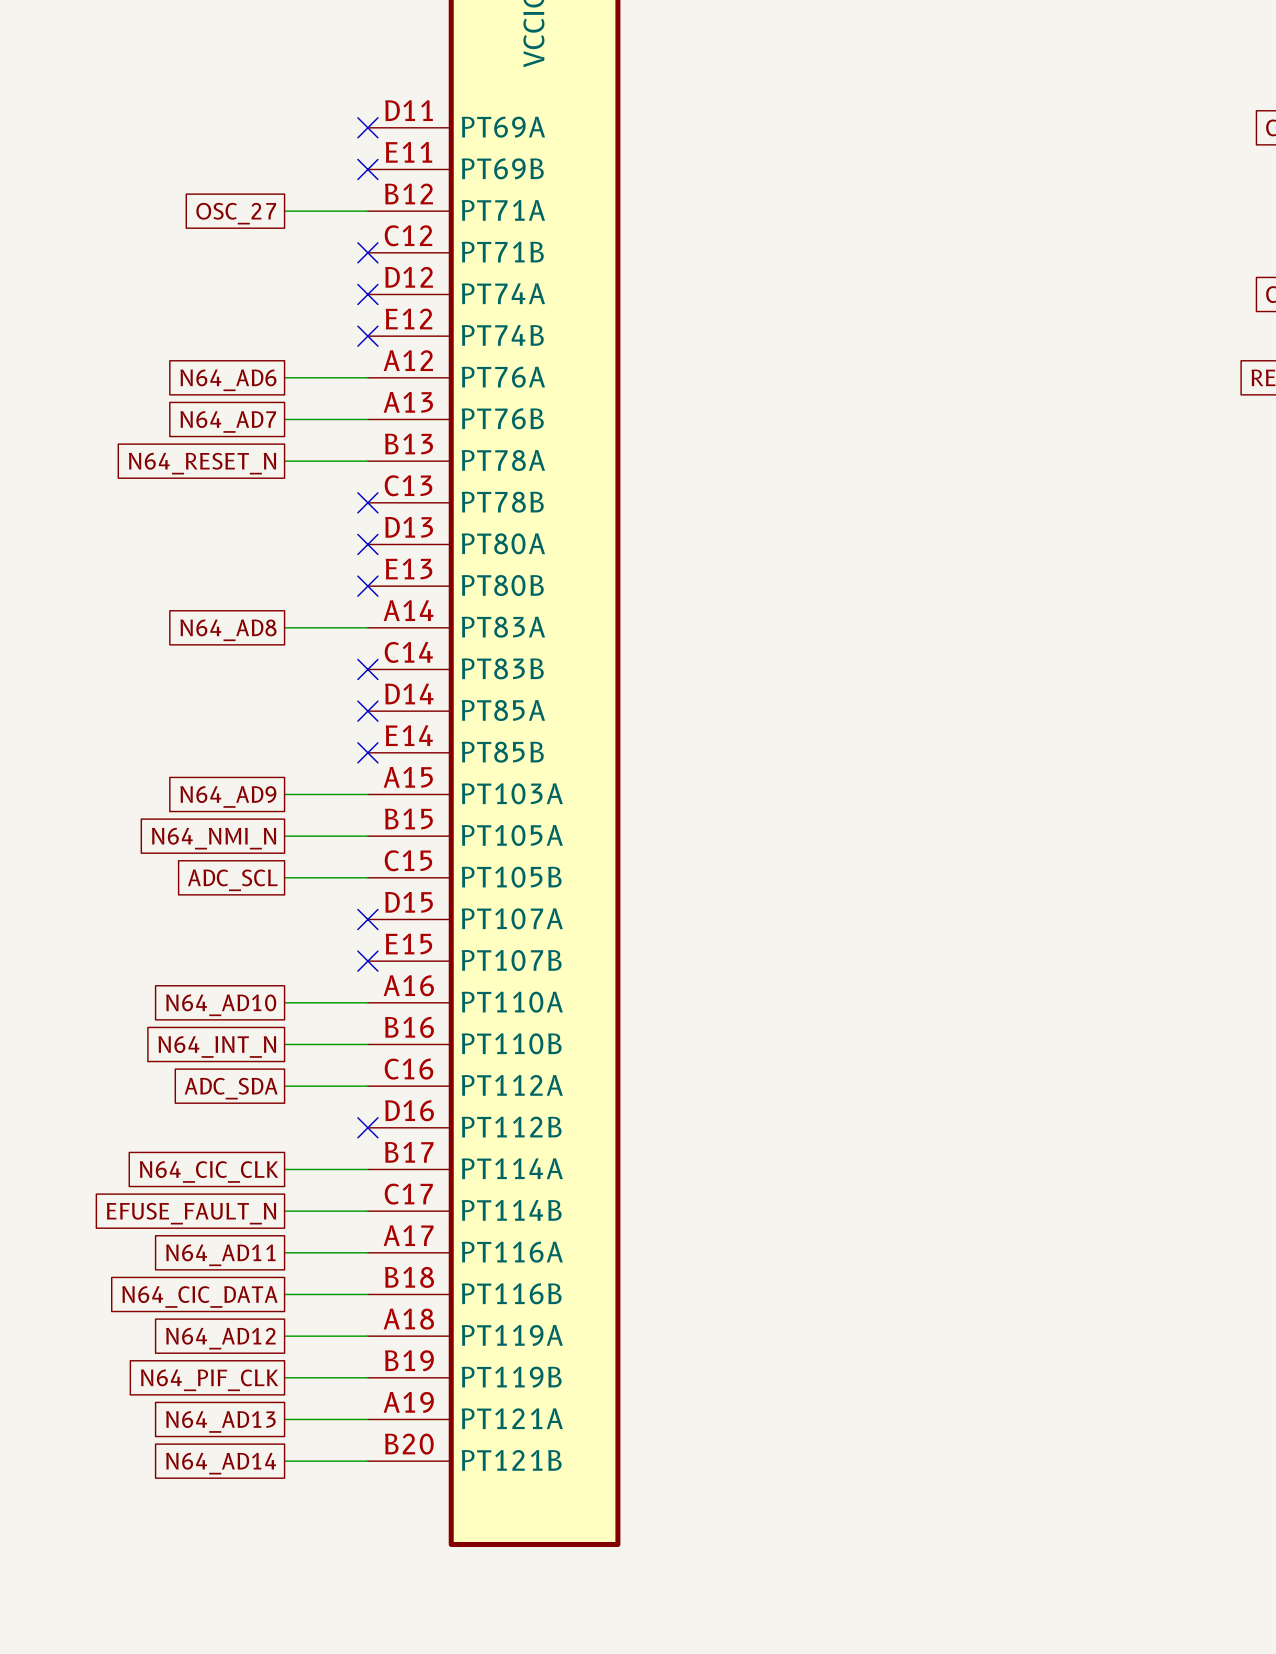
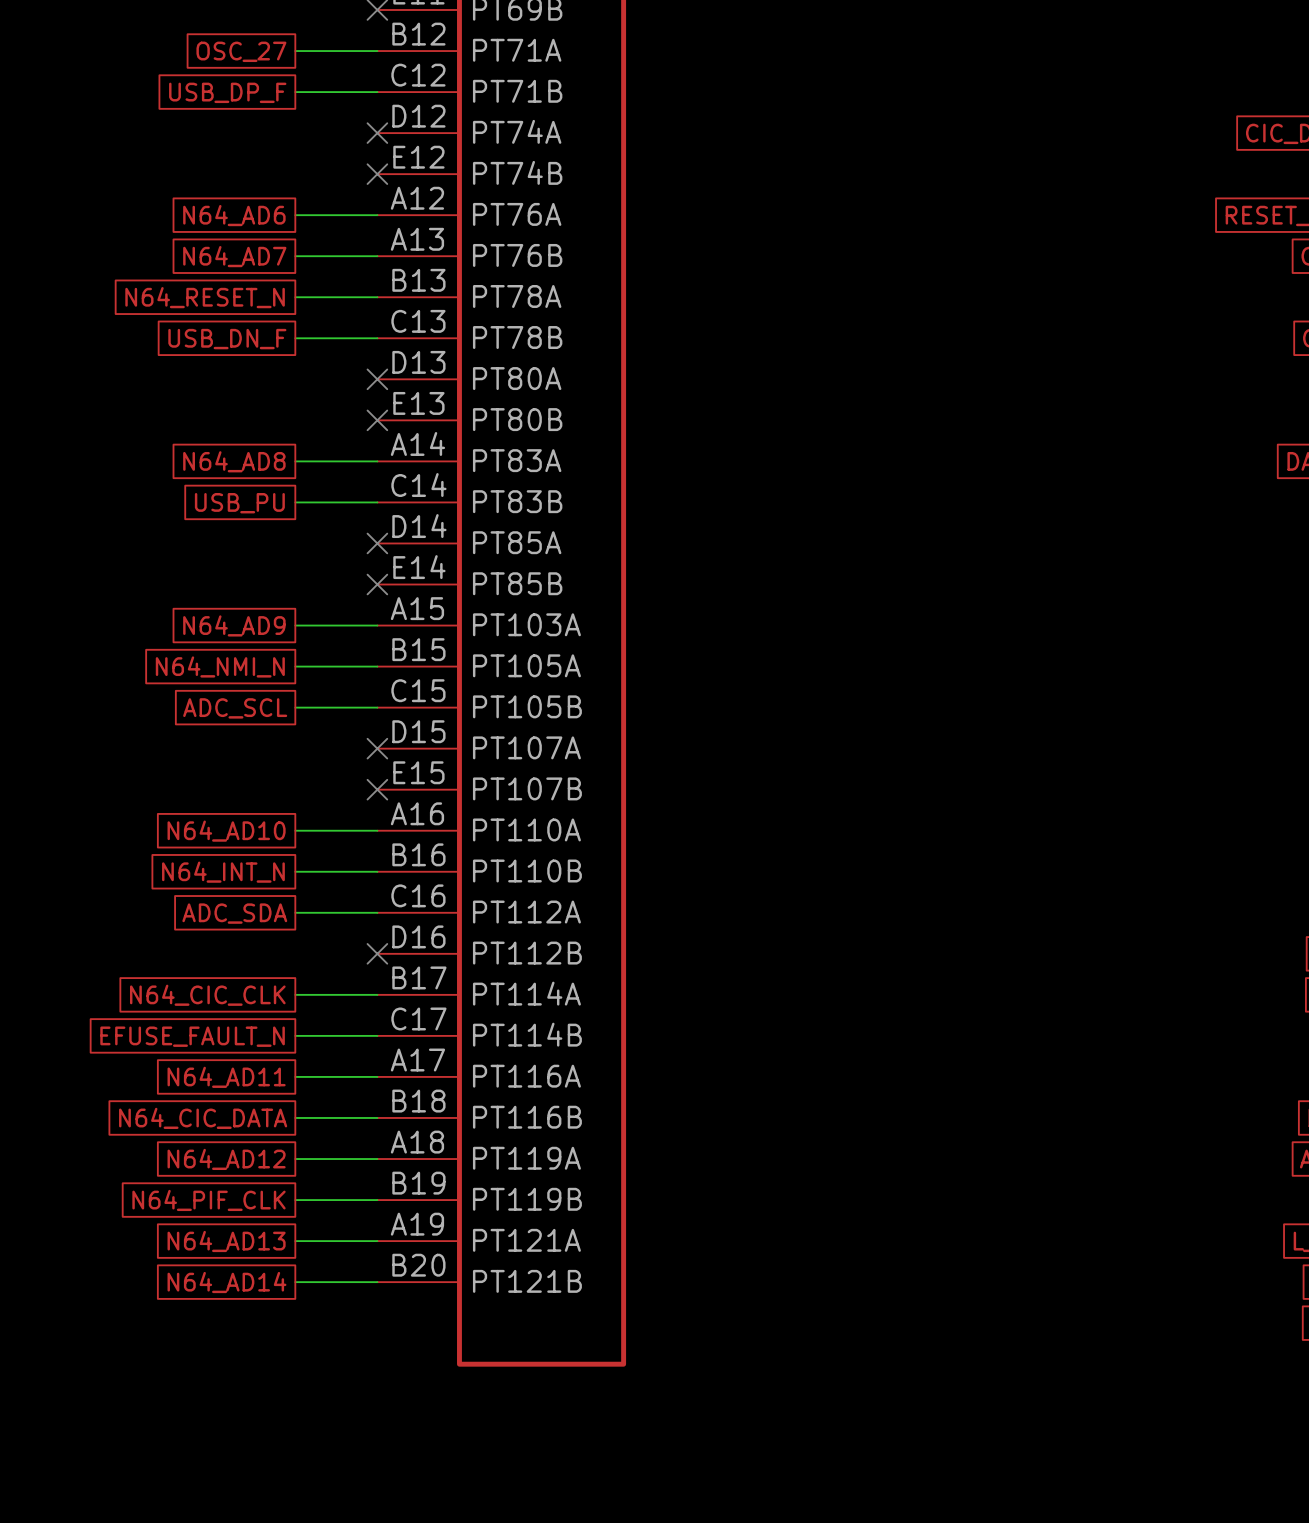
wire: none -> (295, 92) (377, 92)
no-connect mark: (367, 252) -> none
global label: none -> USB_DP_F (227, 92)
wire: none -> (295, 338) (377, 338)
no-connect mark: (367, 502) -> none
global label: none -> USB_DN_F (227, 339)
wire: none -> (295, 502) (377, 502)
no-connect mark: (367, 669) -> none
global label: none -> USB_PU (239, 503)

